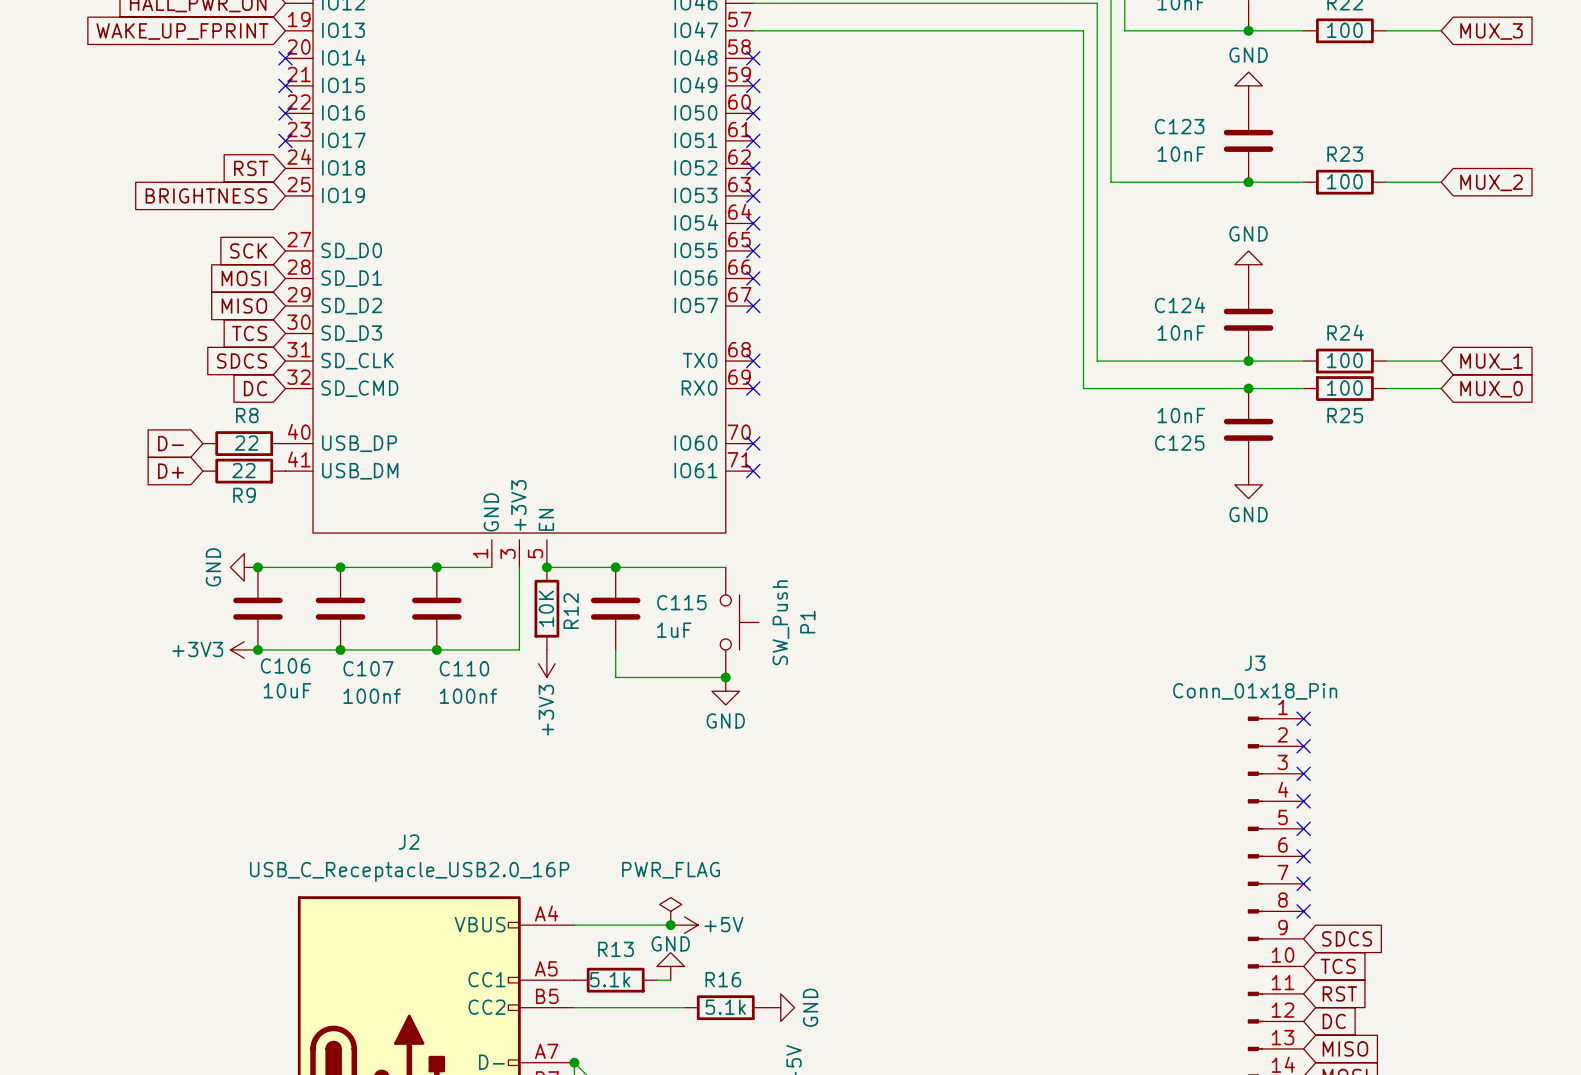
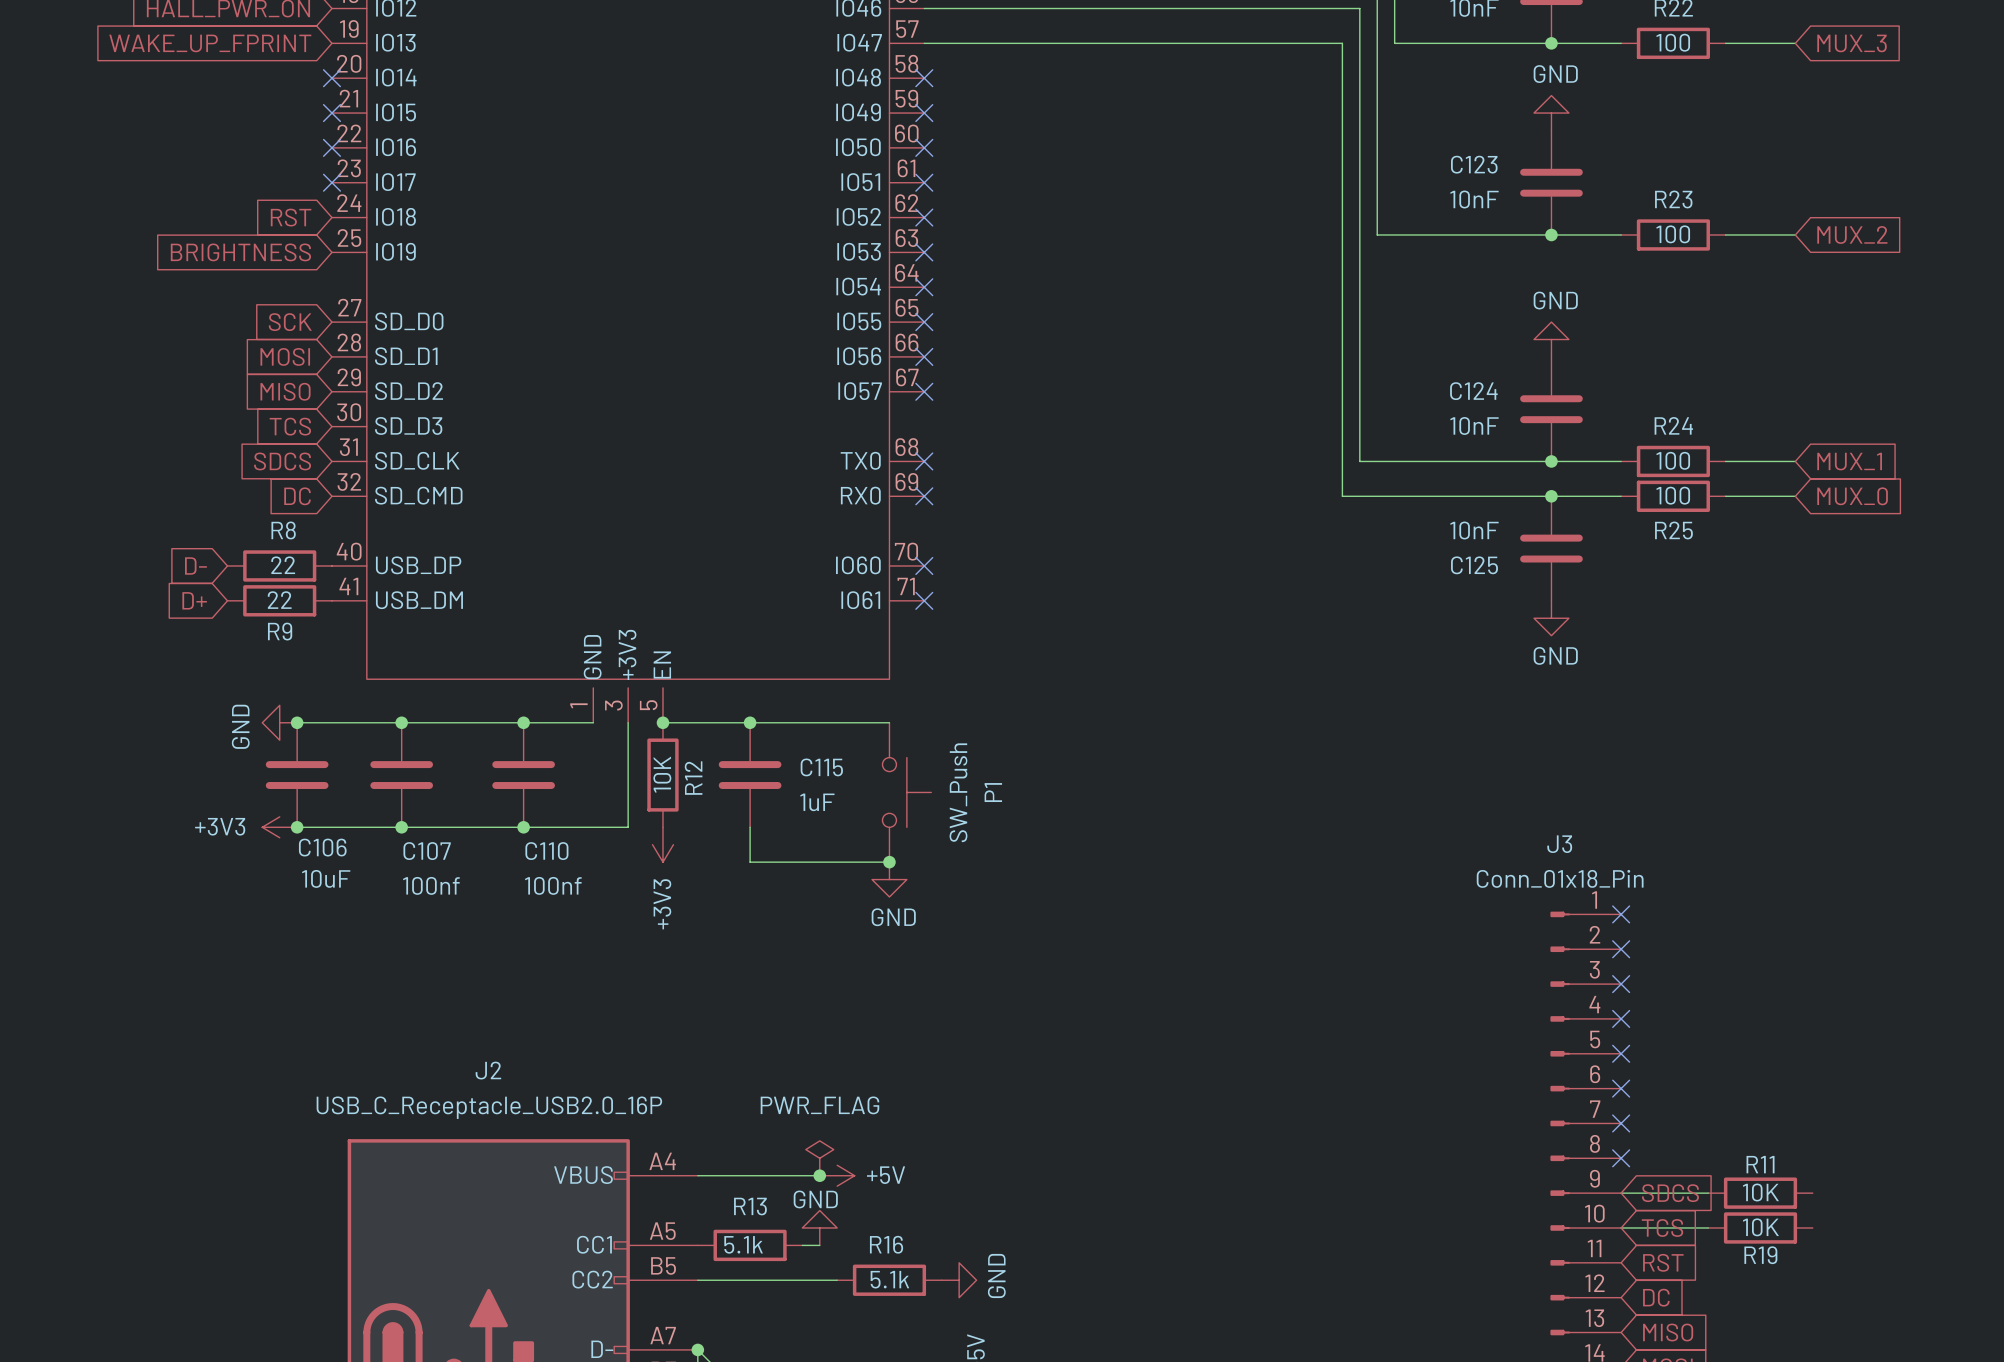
wire: none -> (1621, 1193) (1708, 1193)
R11: none -> 10K (1760, 1193)
wire: none -> (1621, 1227) (1708, 1227)
R19: none -> 10K (1760, 1227)

